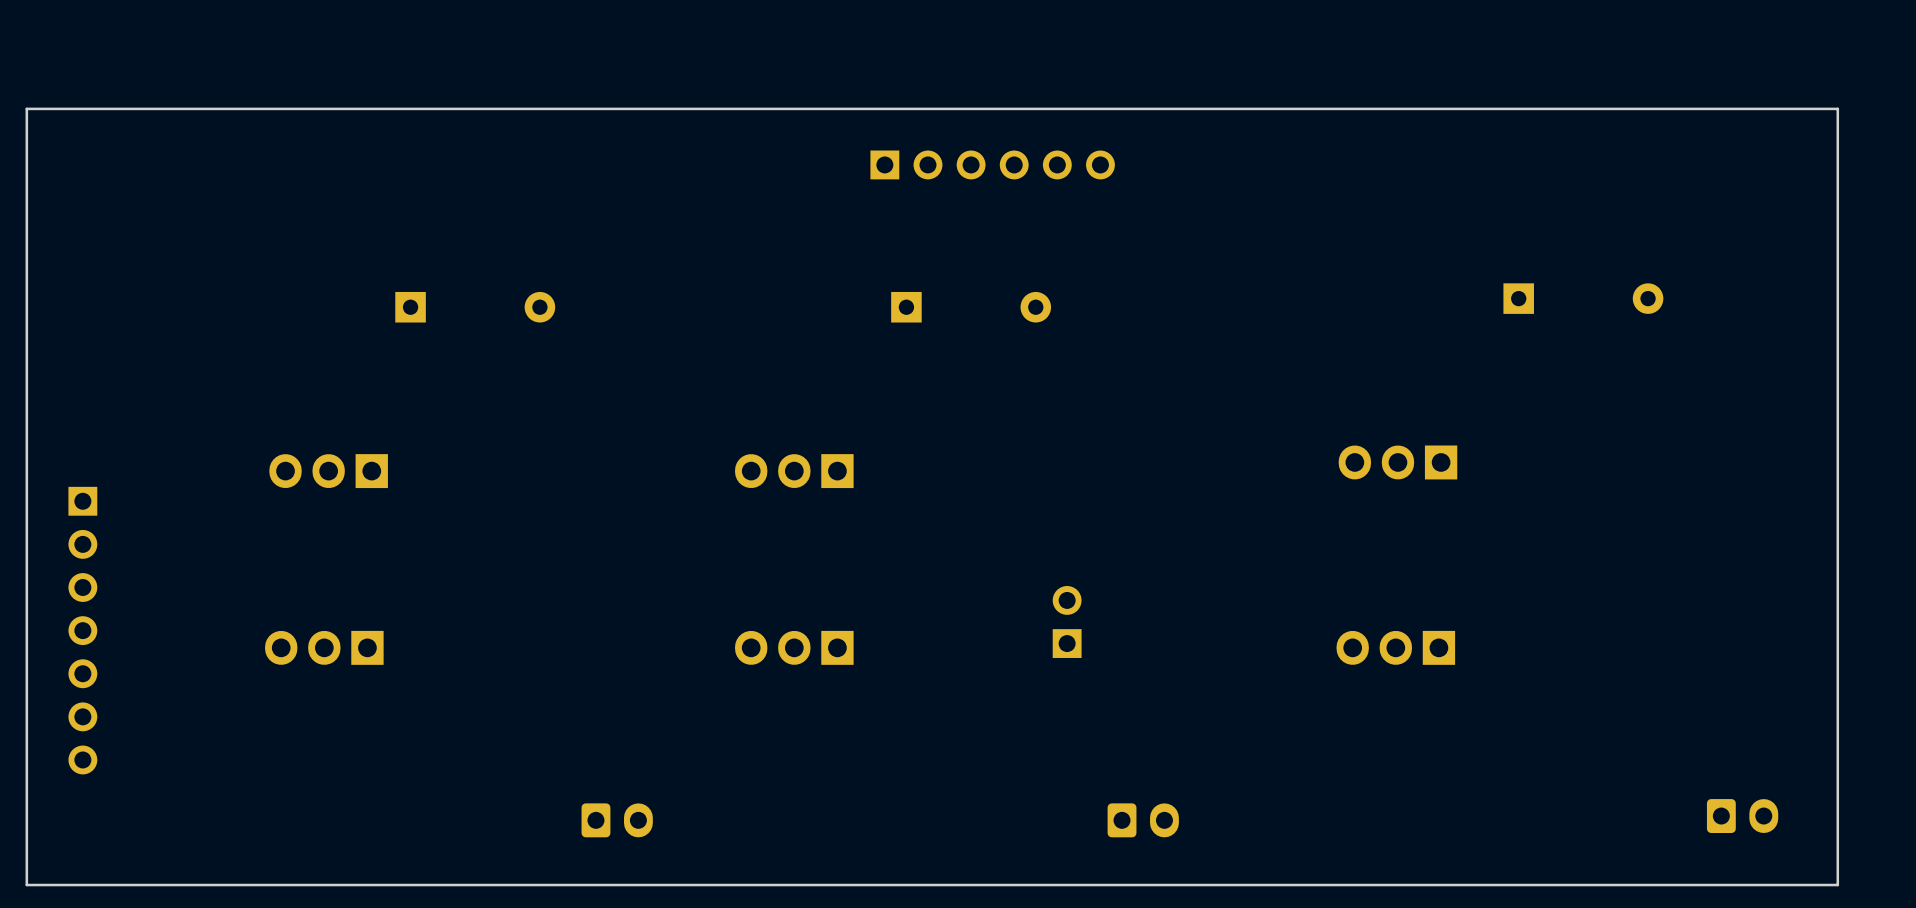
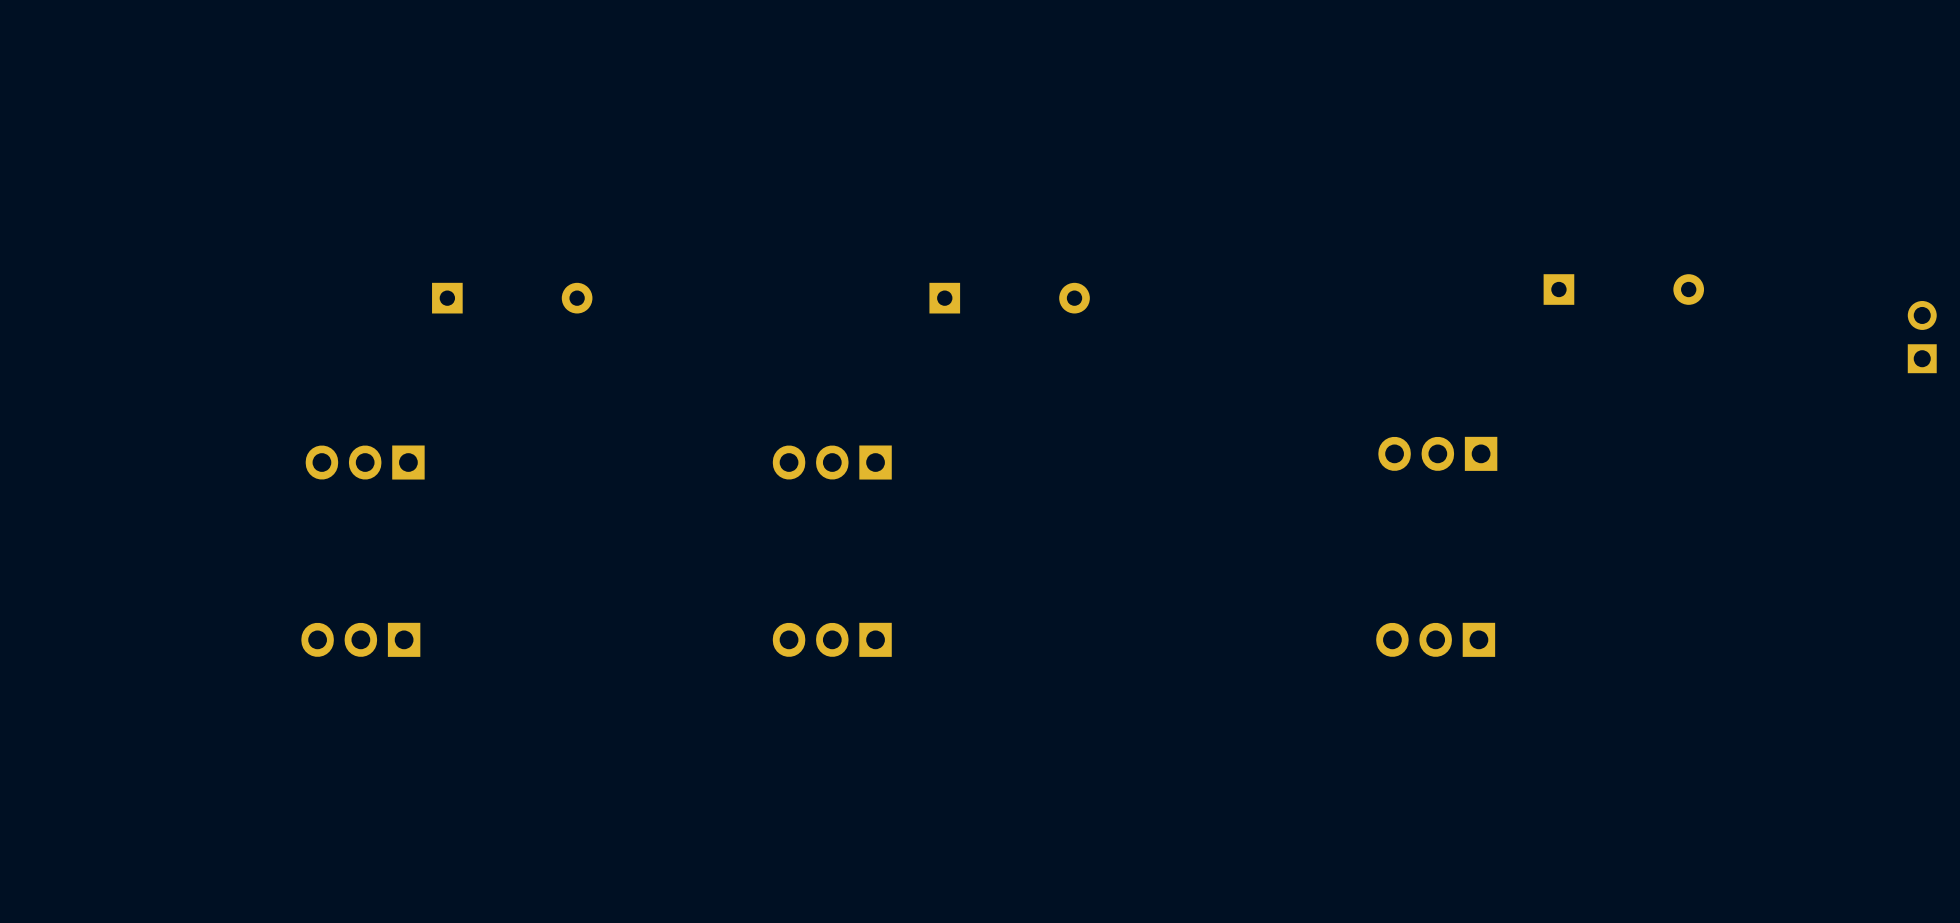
board edge: (1837, 108) (26, 108) (26, 885) (1837, 885) (1837, 108) -> none
part: (992, 164) -> none
part: none -> (1922, 337)
part: (1067, 621) -> none
part: (82, 630) -> none
part: (1742, 816) -> none
part: (617, 820) -> none
part: (1143, 820) -> none

